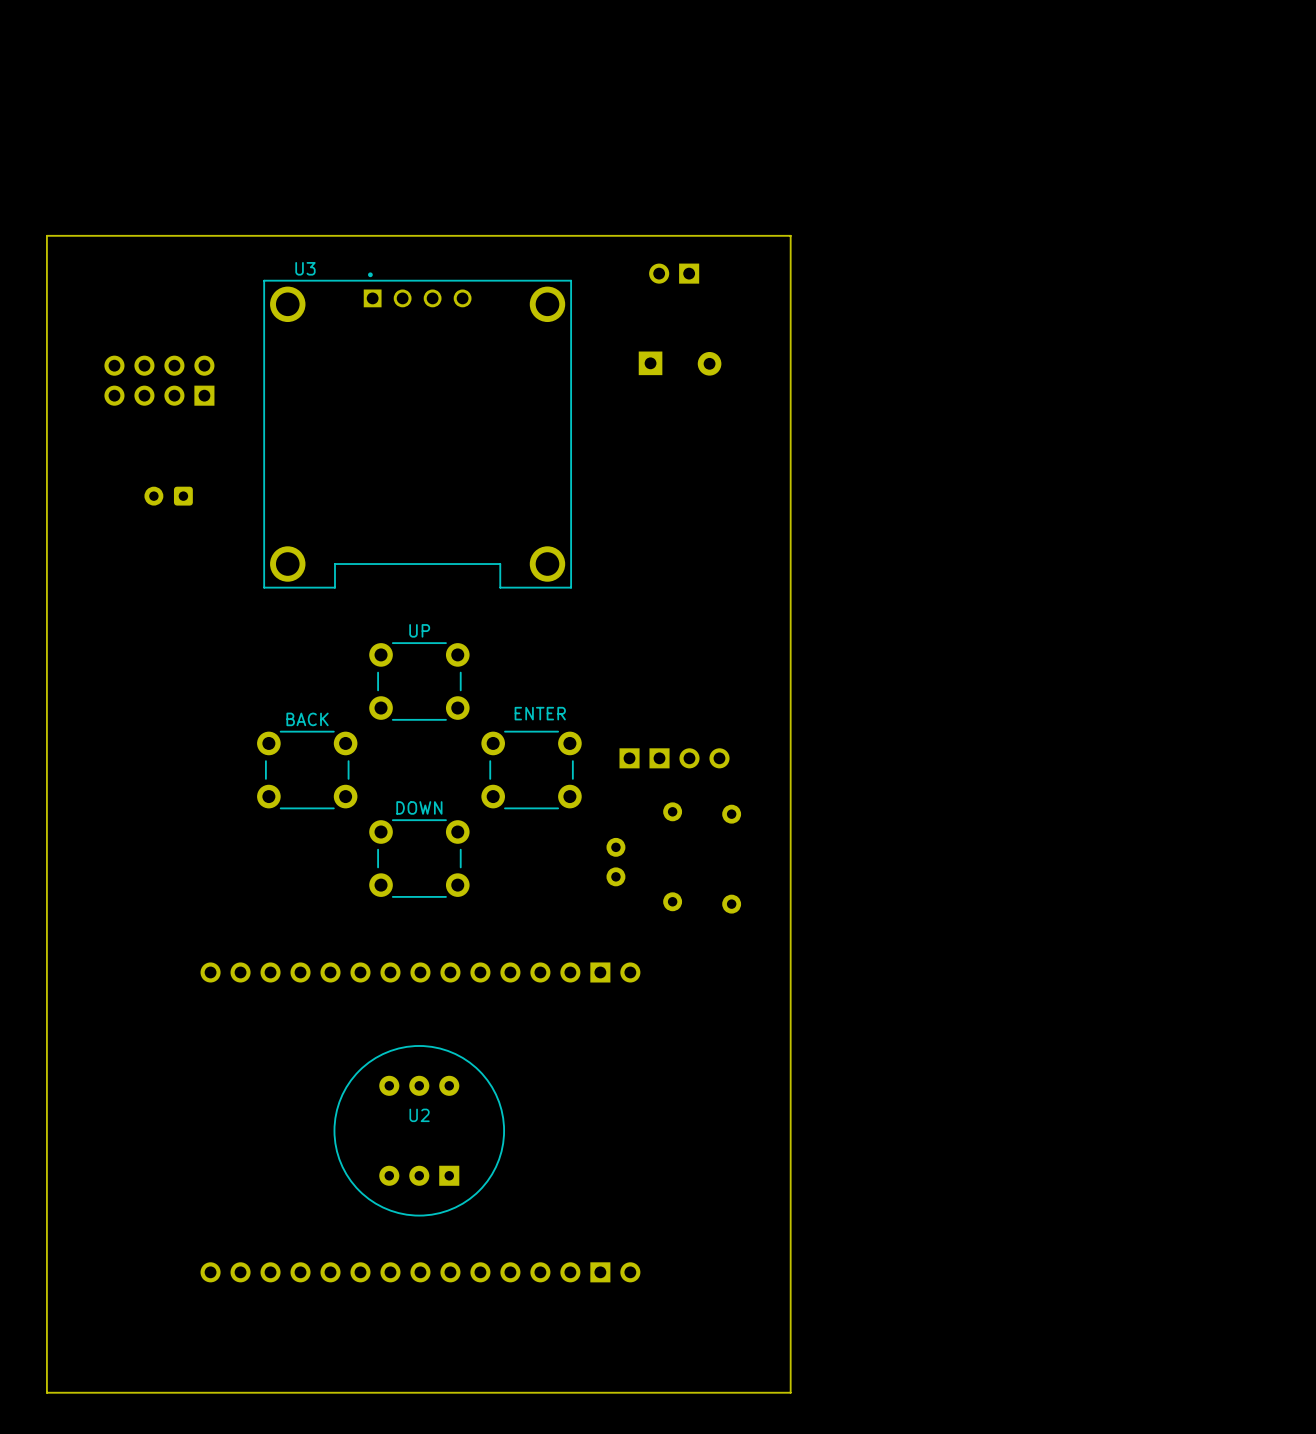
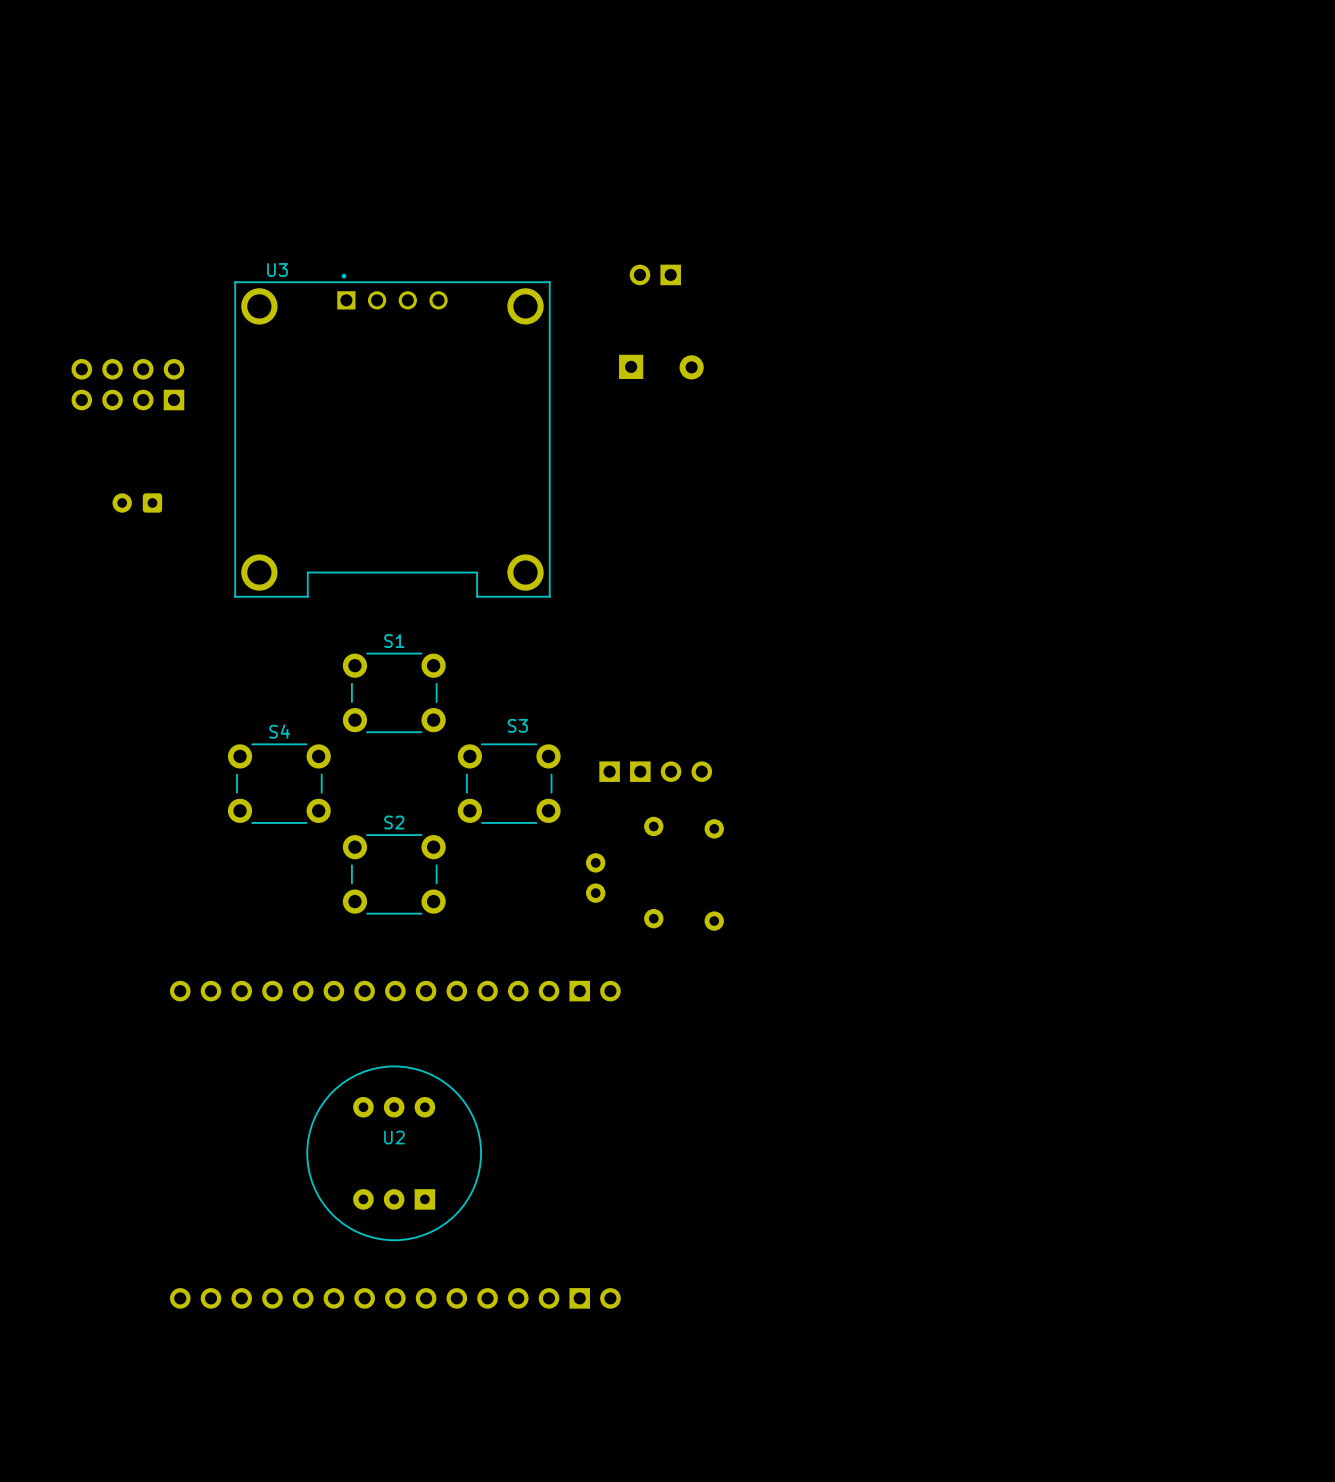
board edge: (46, 235) (790, 235) (790, 1392) (46, 1392) (46, 235) -> none
UP name: UP (419, 630) -> S1 (394, 641)
ENTER name: ENTER (540, 713) -> S3 (517, 725)
BACK name: BACK (307, 719) -> S4 (279, 731)
DOWN name: DOWN (419, 807) -> S2 (394, 822)

